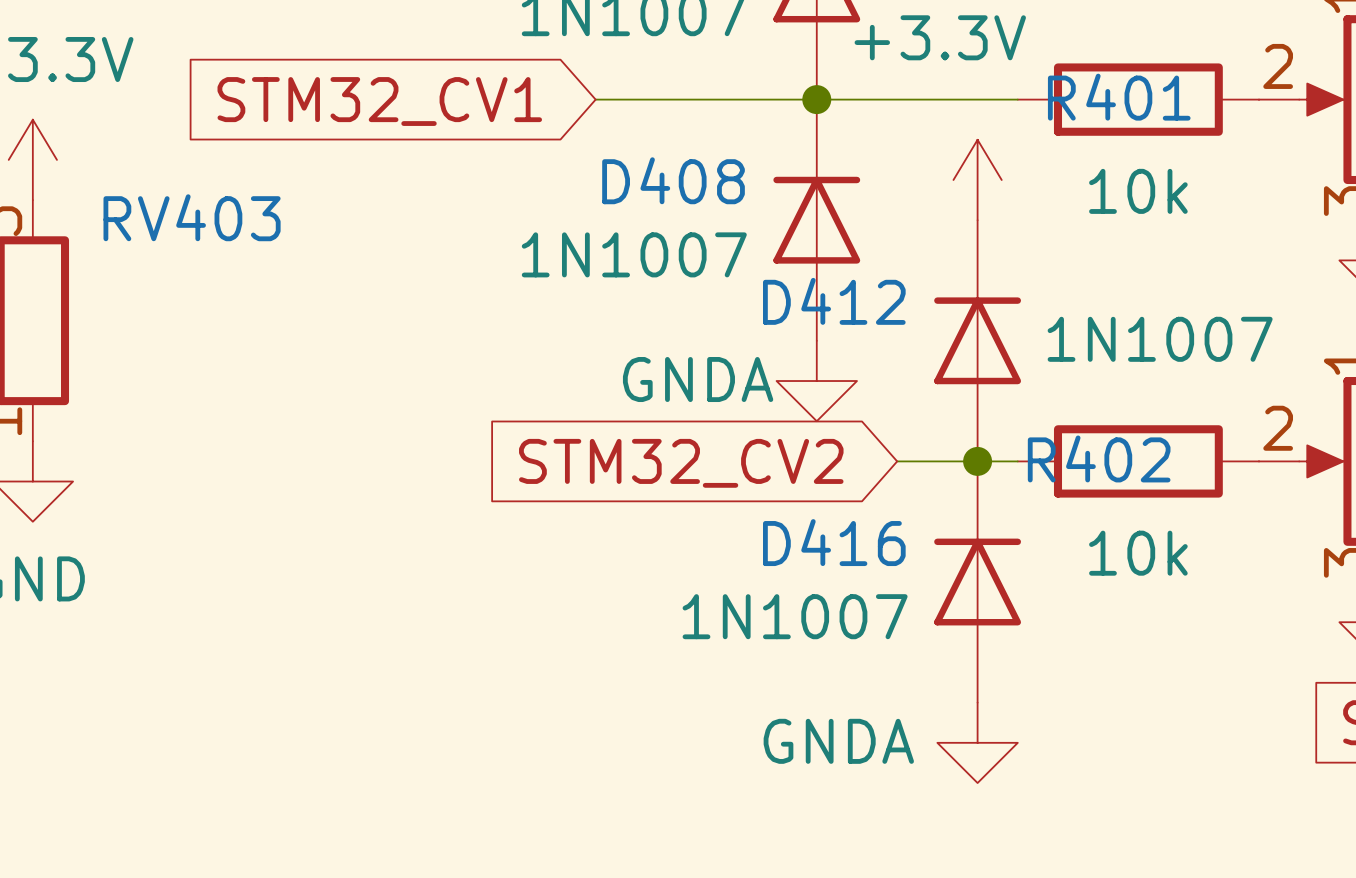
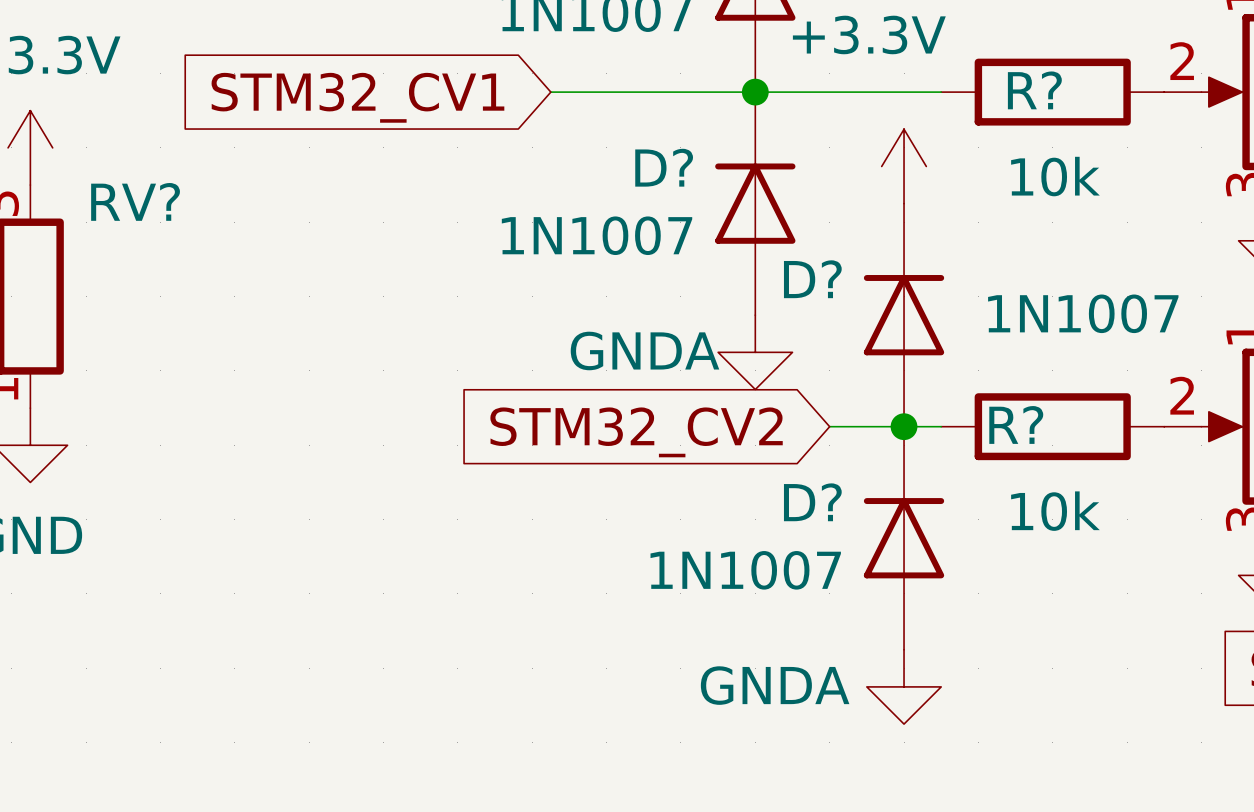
R401 name: R401 (1119, 97) -> R? (1034, 90)
D408 name: D408 (673, 180) -> D? (664, 167)
RV403 name: RV403 (192, 217) -> RV? (135, 201)
D412 name: D412 (834, 301) -> D? (812, 279)
R402 name: R402 (1099, 458) -> R? (1016, 424)
D416 name: D416 (834, 542) -> D? (812, 502)

